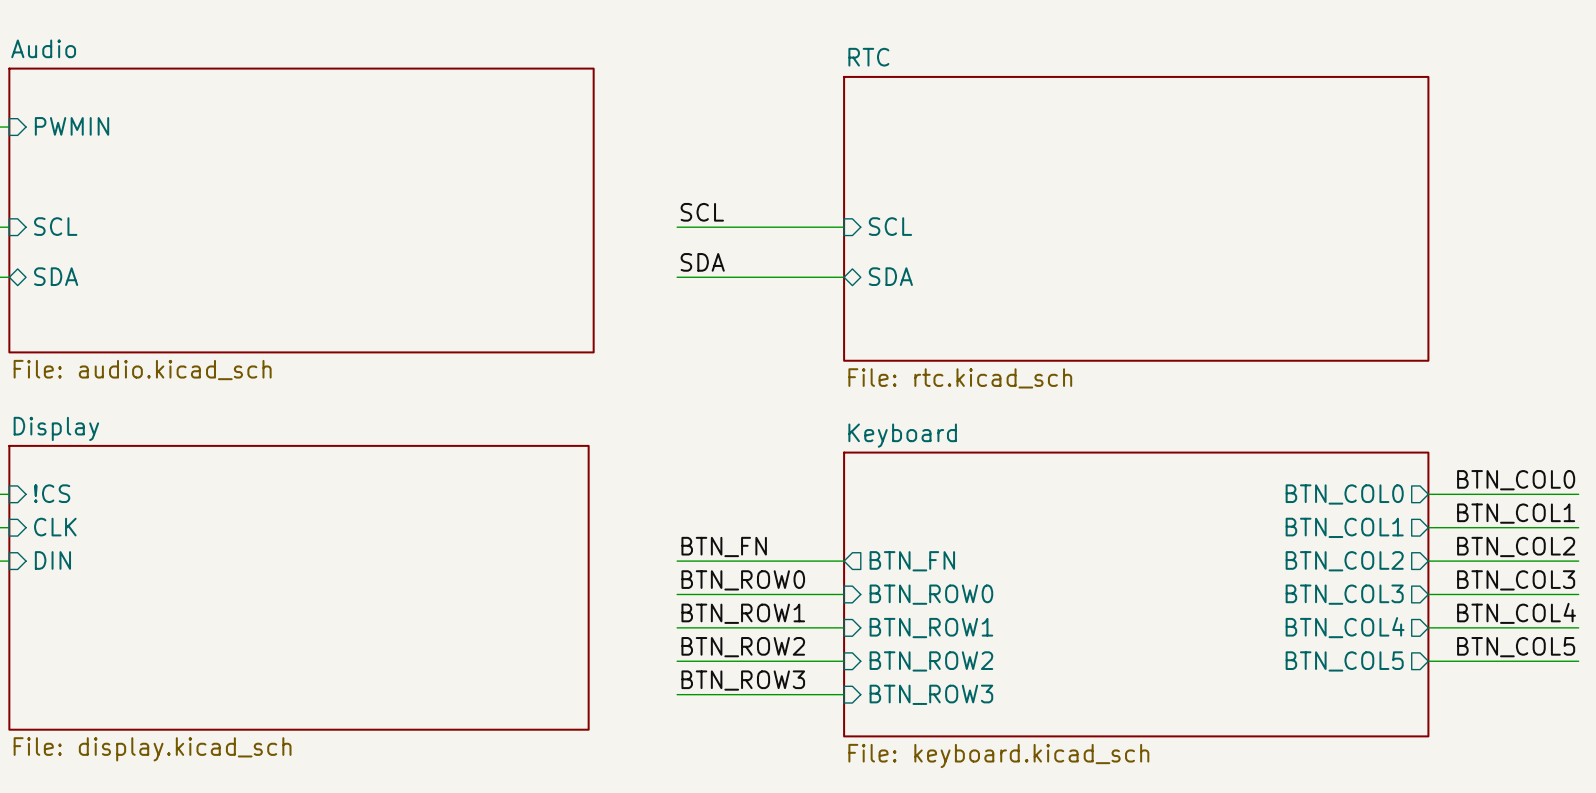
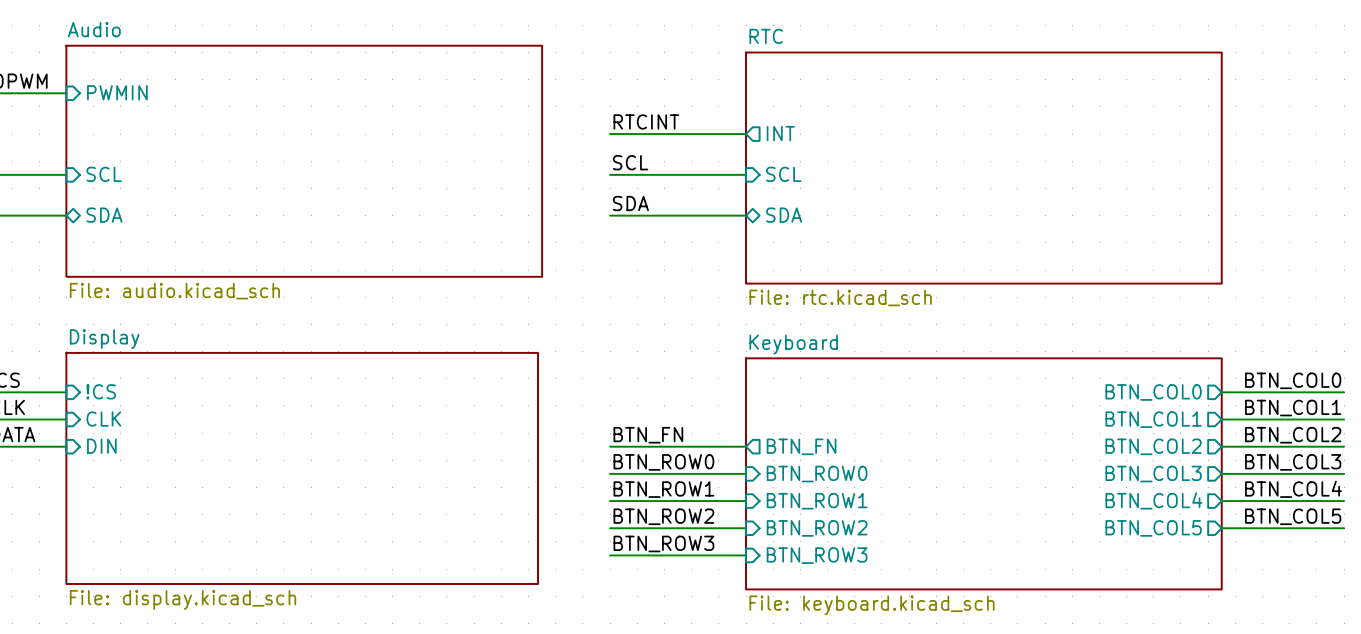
label: none -> RTCINT (646, 121)
sheet pin: none -> INT (780, 133)
wire: none -> (610, 134) (746, 134)

